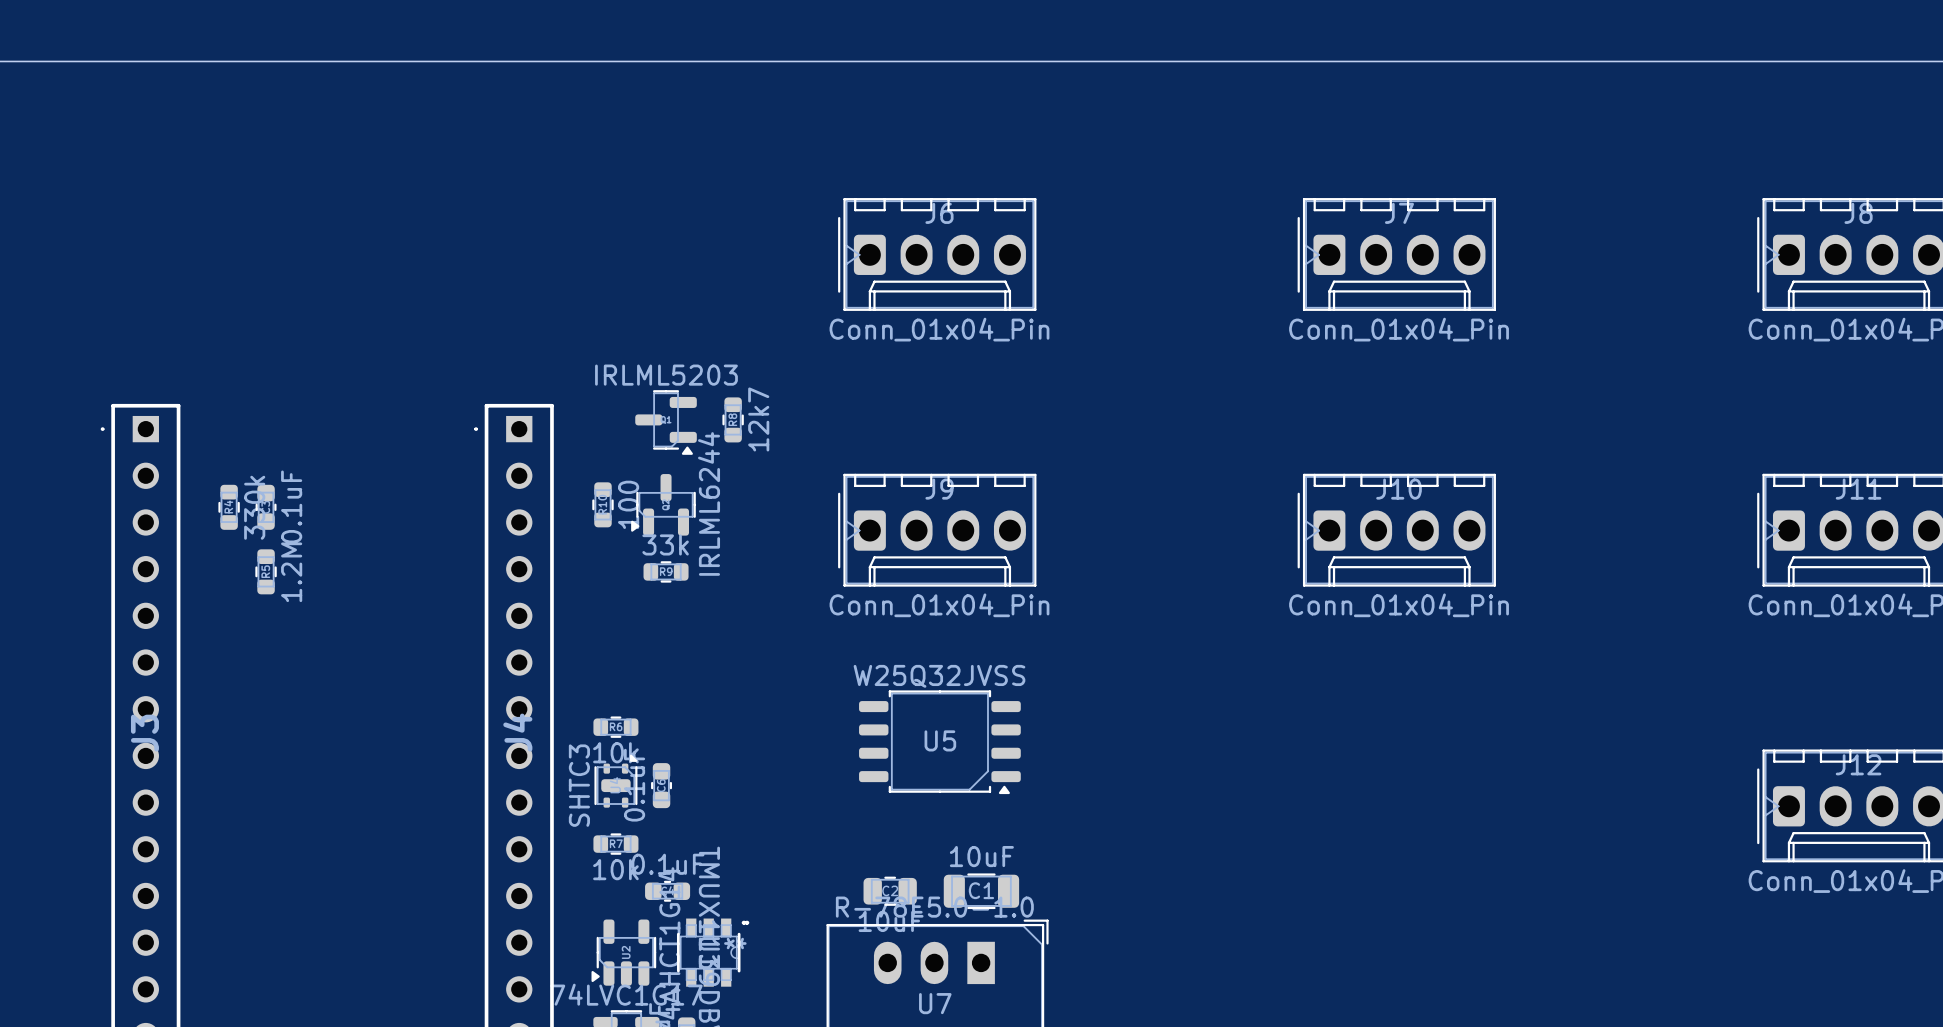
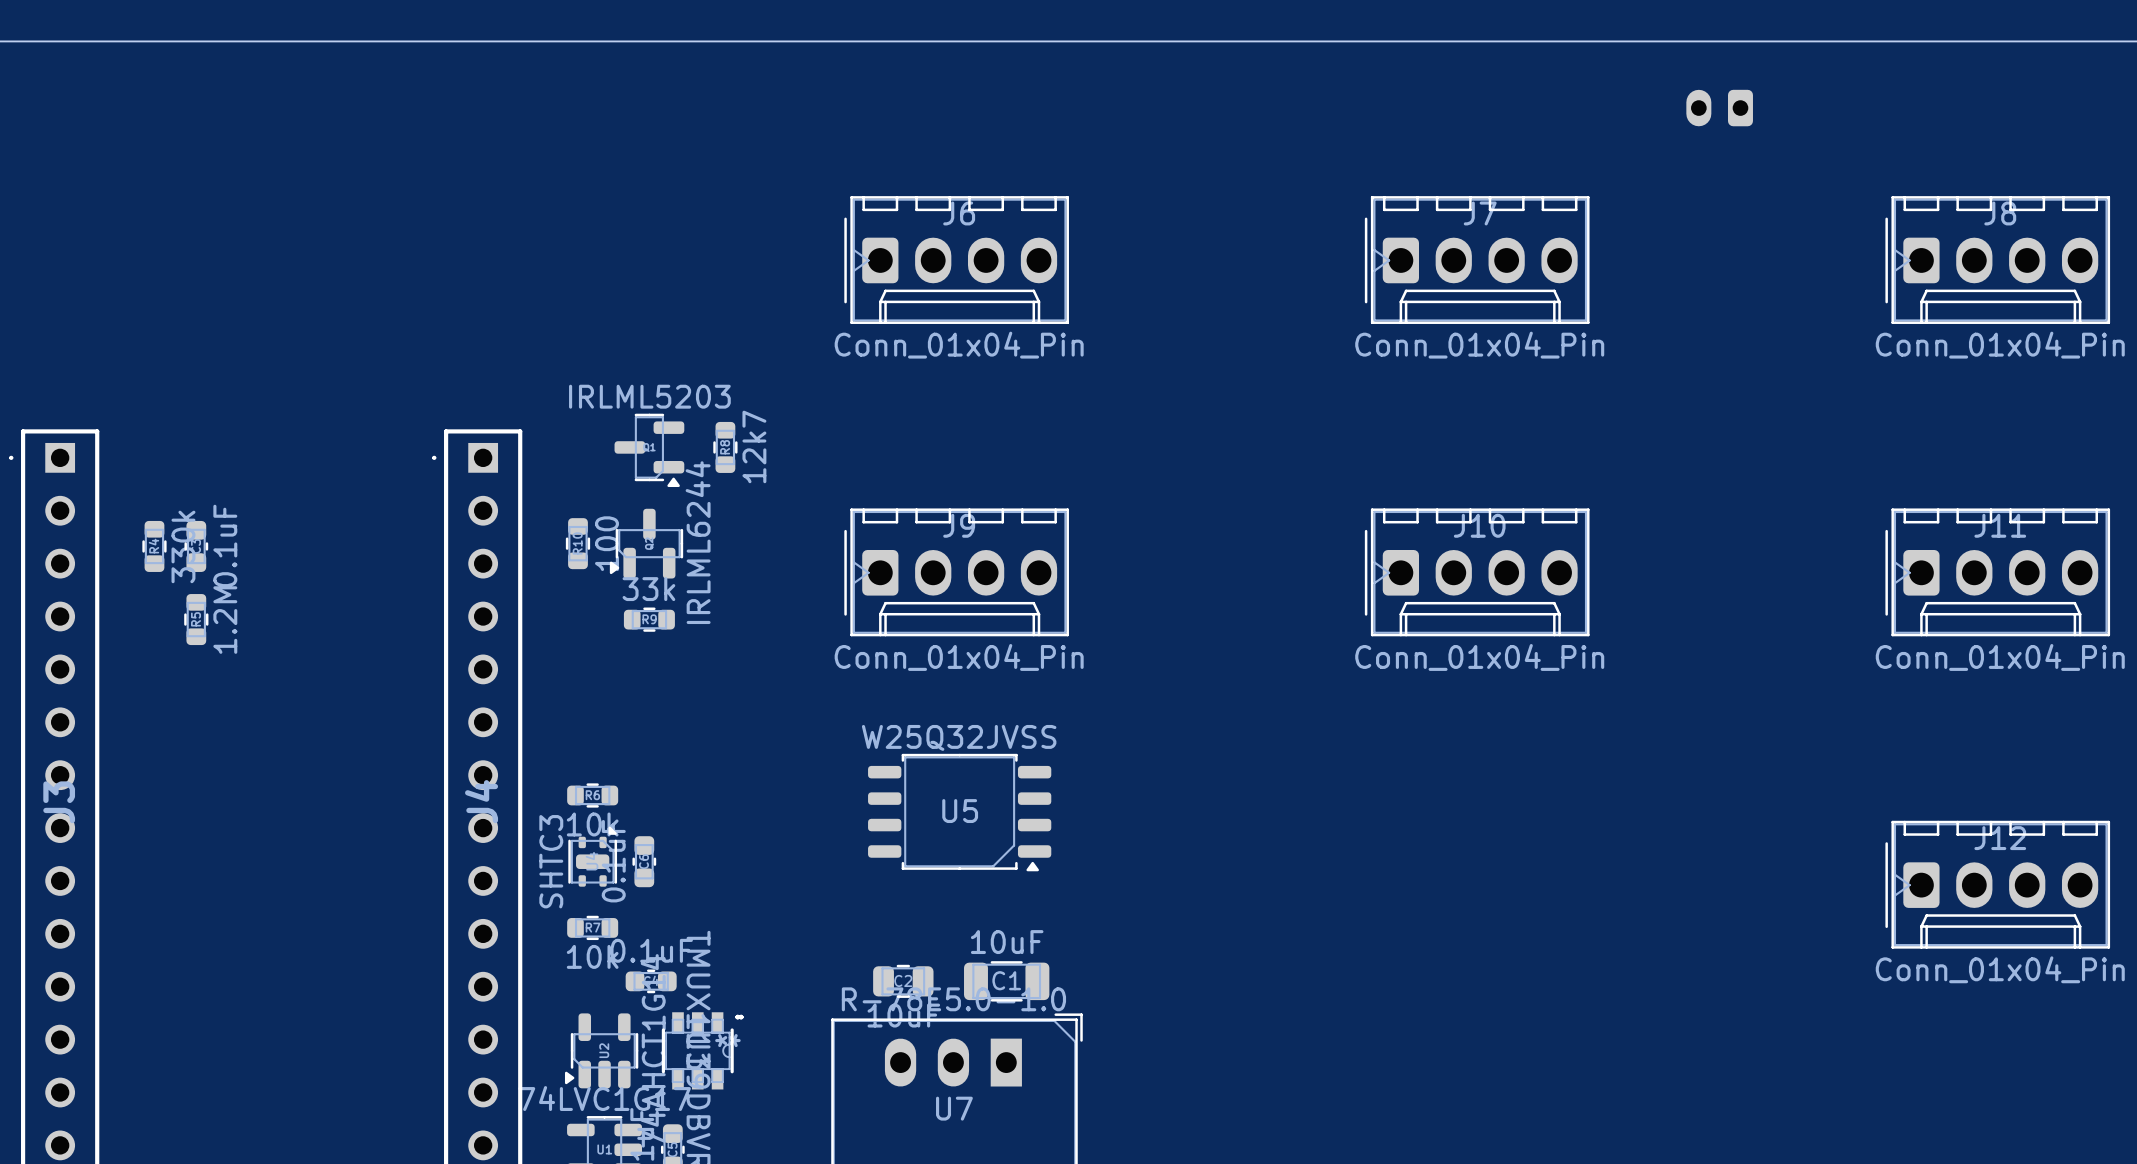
part: none -> (1719, 108)

